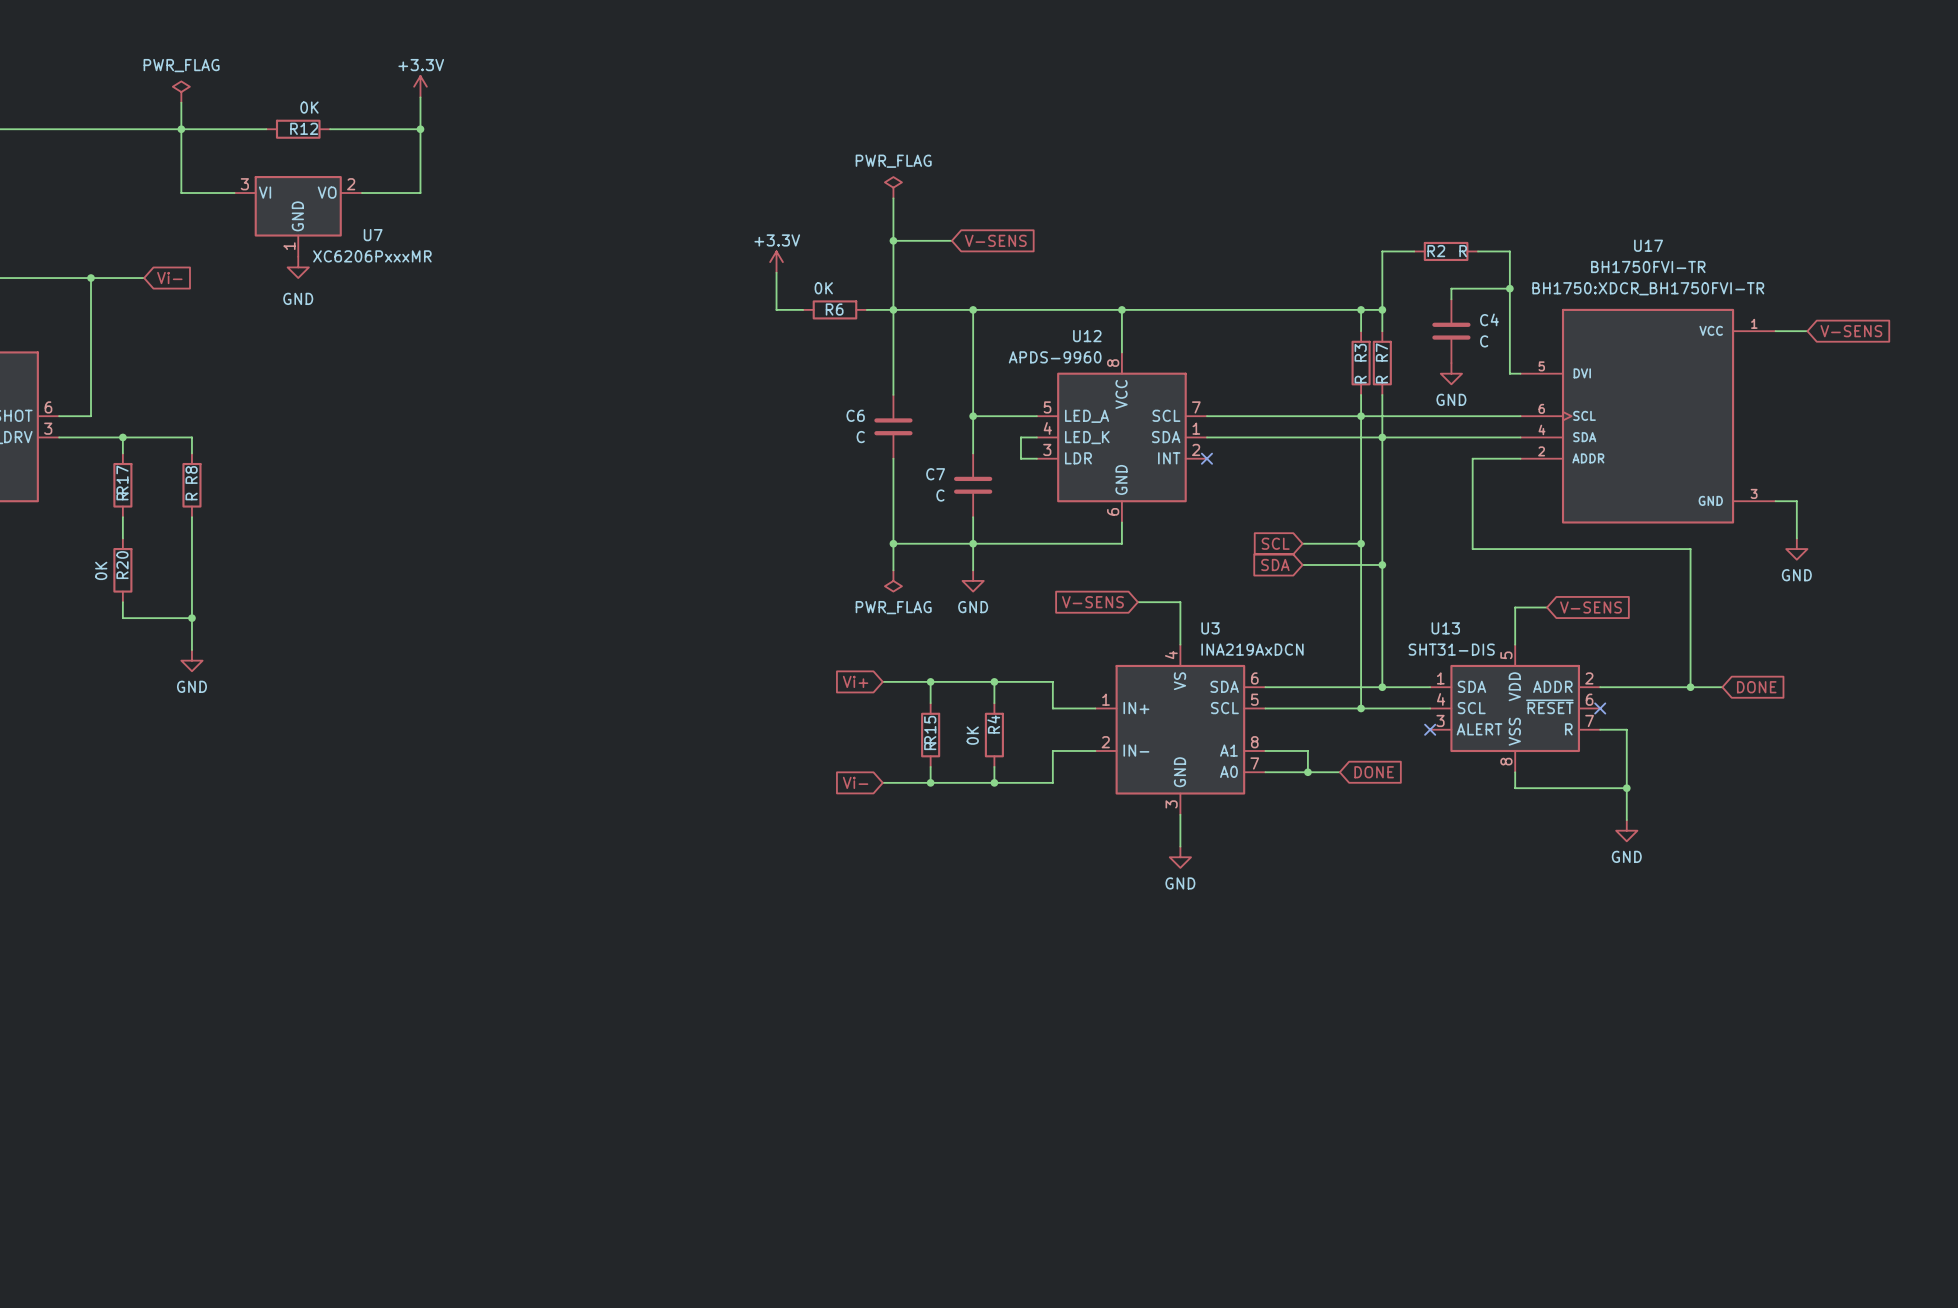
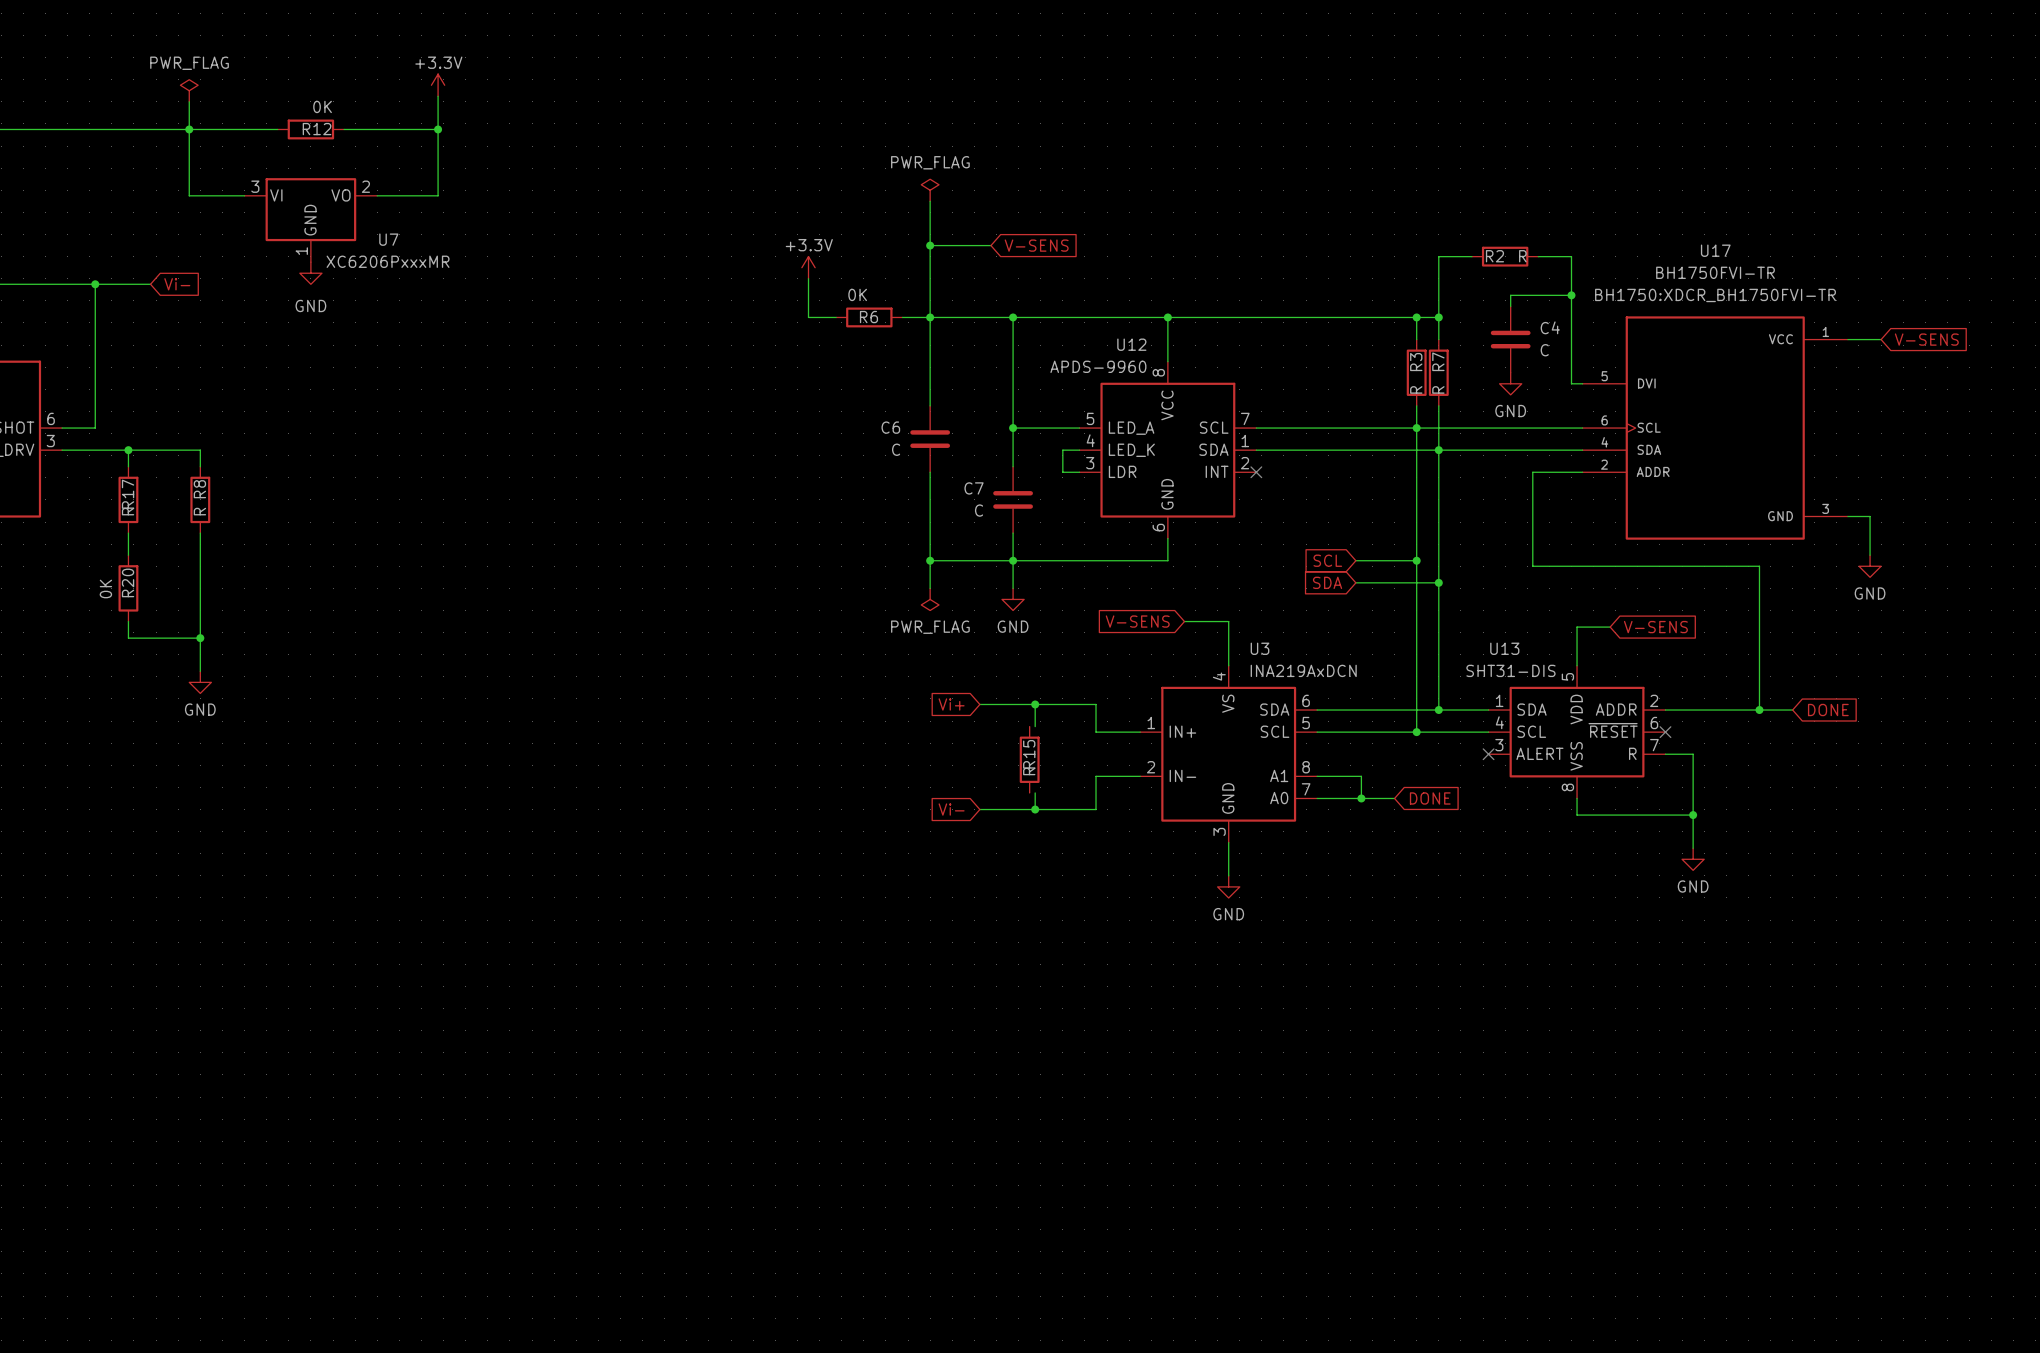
global label position: Vi+ (855, 681) -> Vi+ (951, 704)
wire: (882, 681) (941, 681) -> none
wire: (930, 681) (930, 703) -> none
junction: (930, 681) -> none
R15 position: (930, 735) -> (1029, 759)
R4: 0K (994, 735) -> none
wire: (930, 766) (930, 782) -> none
global label position: Vi- (855, 782) -> Vi- (951, 809)
wire: (882, 782) (941, 782) -> none
junction: (930, 782) -> none

